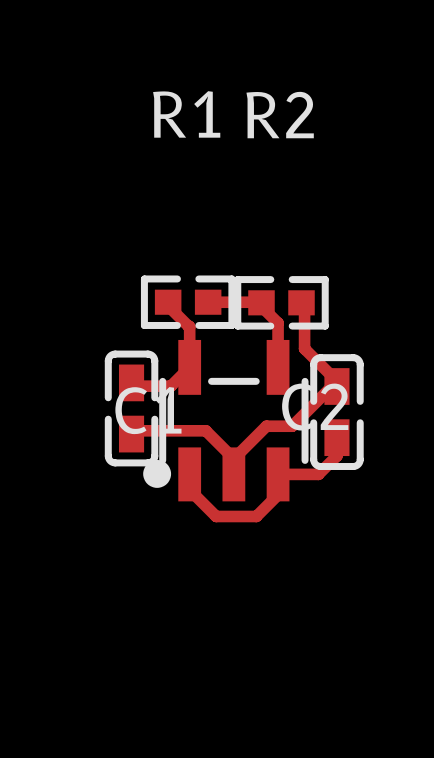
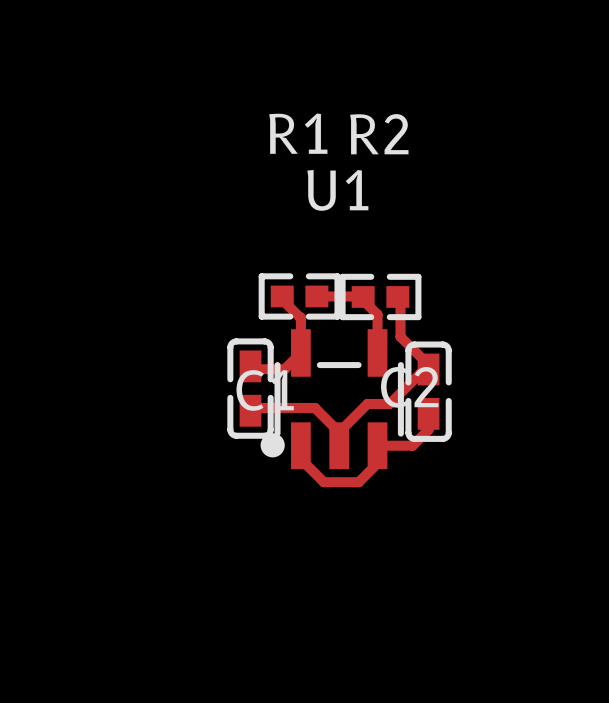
U1 name: none -> U1 (337, 190)

